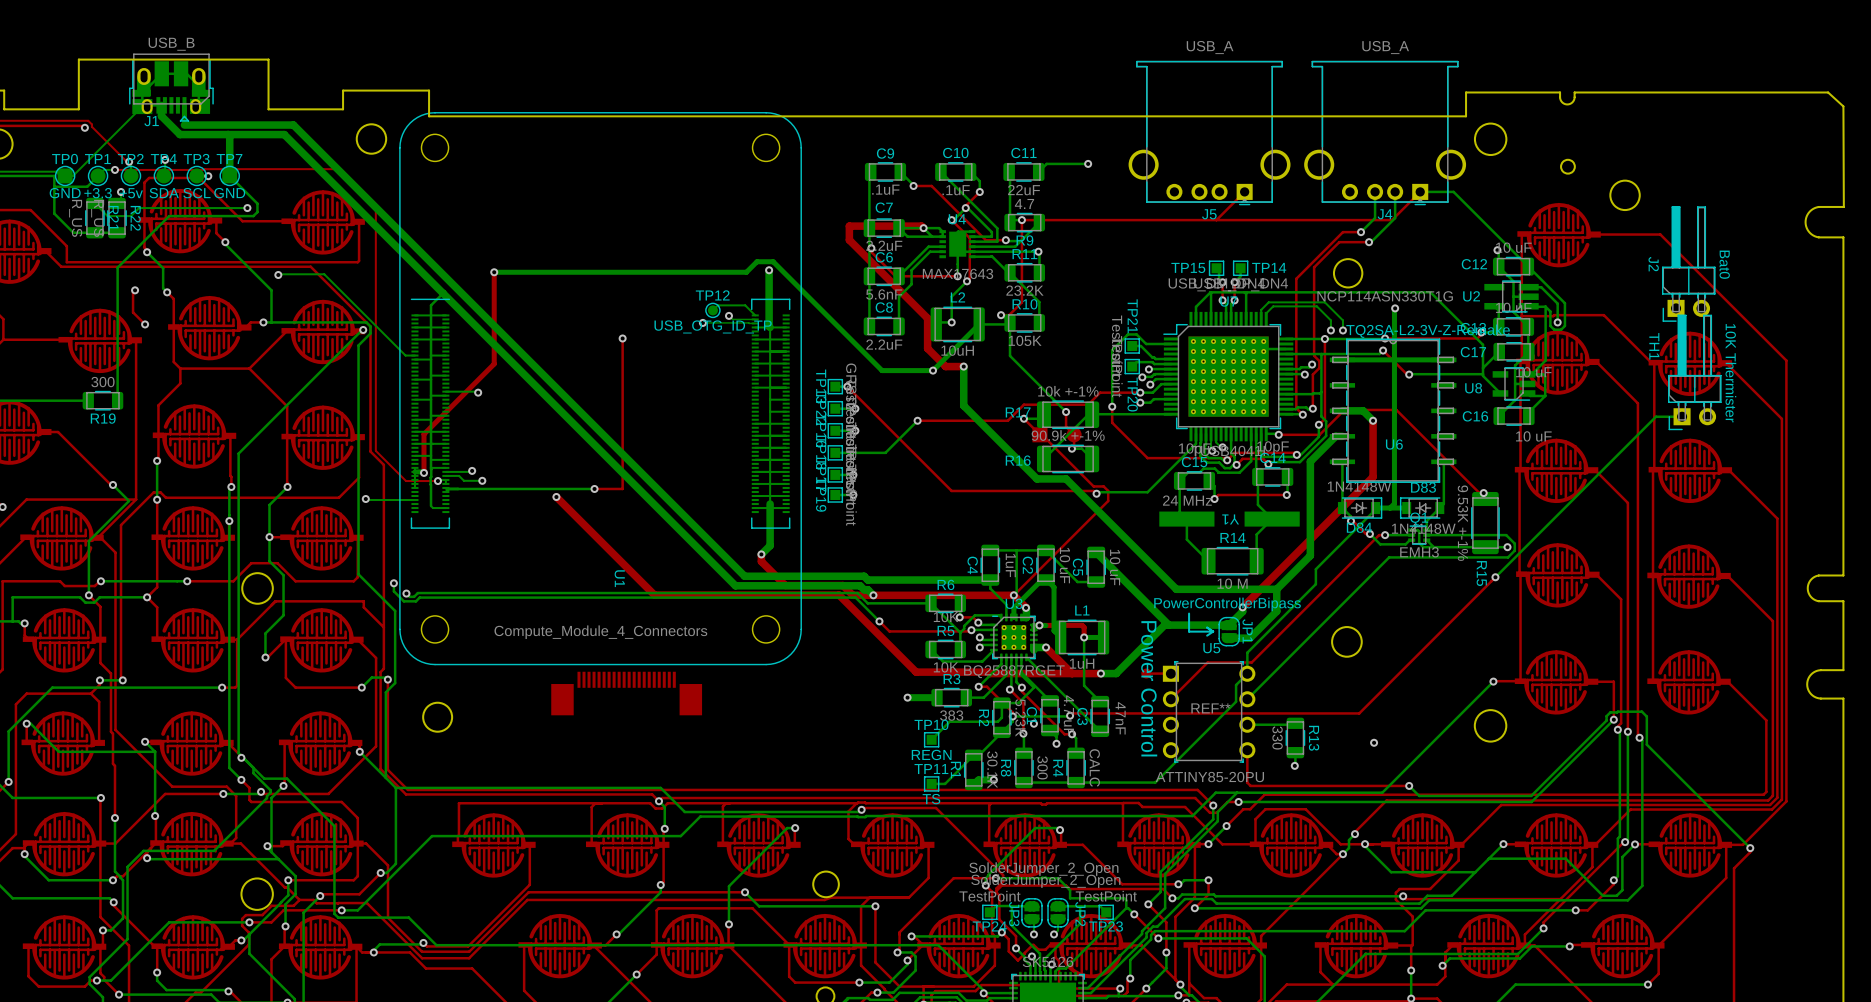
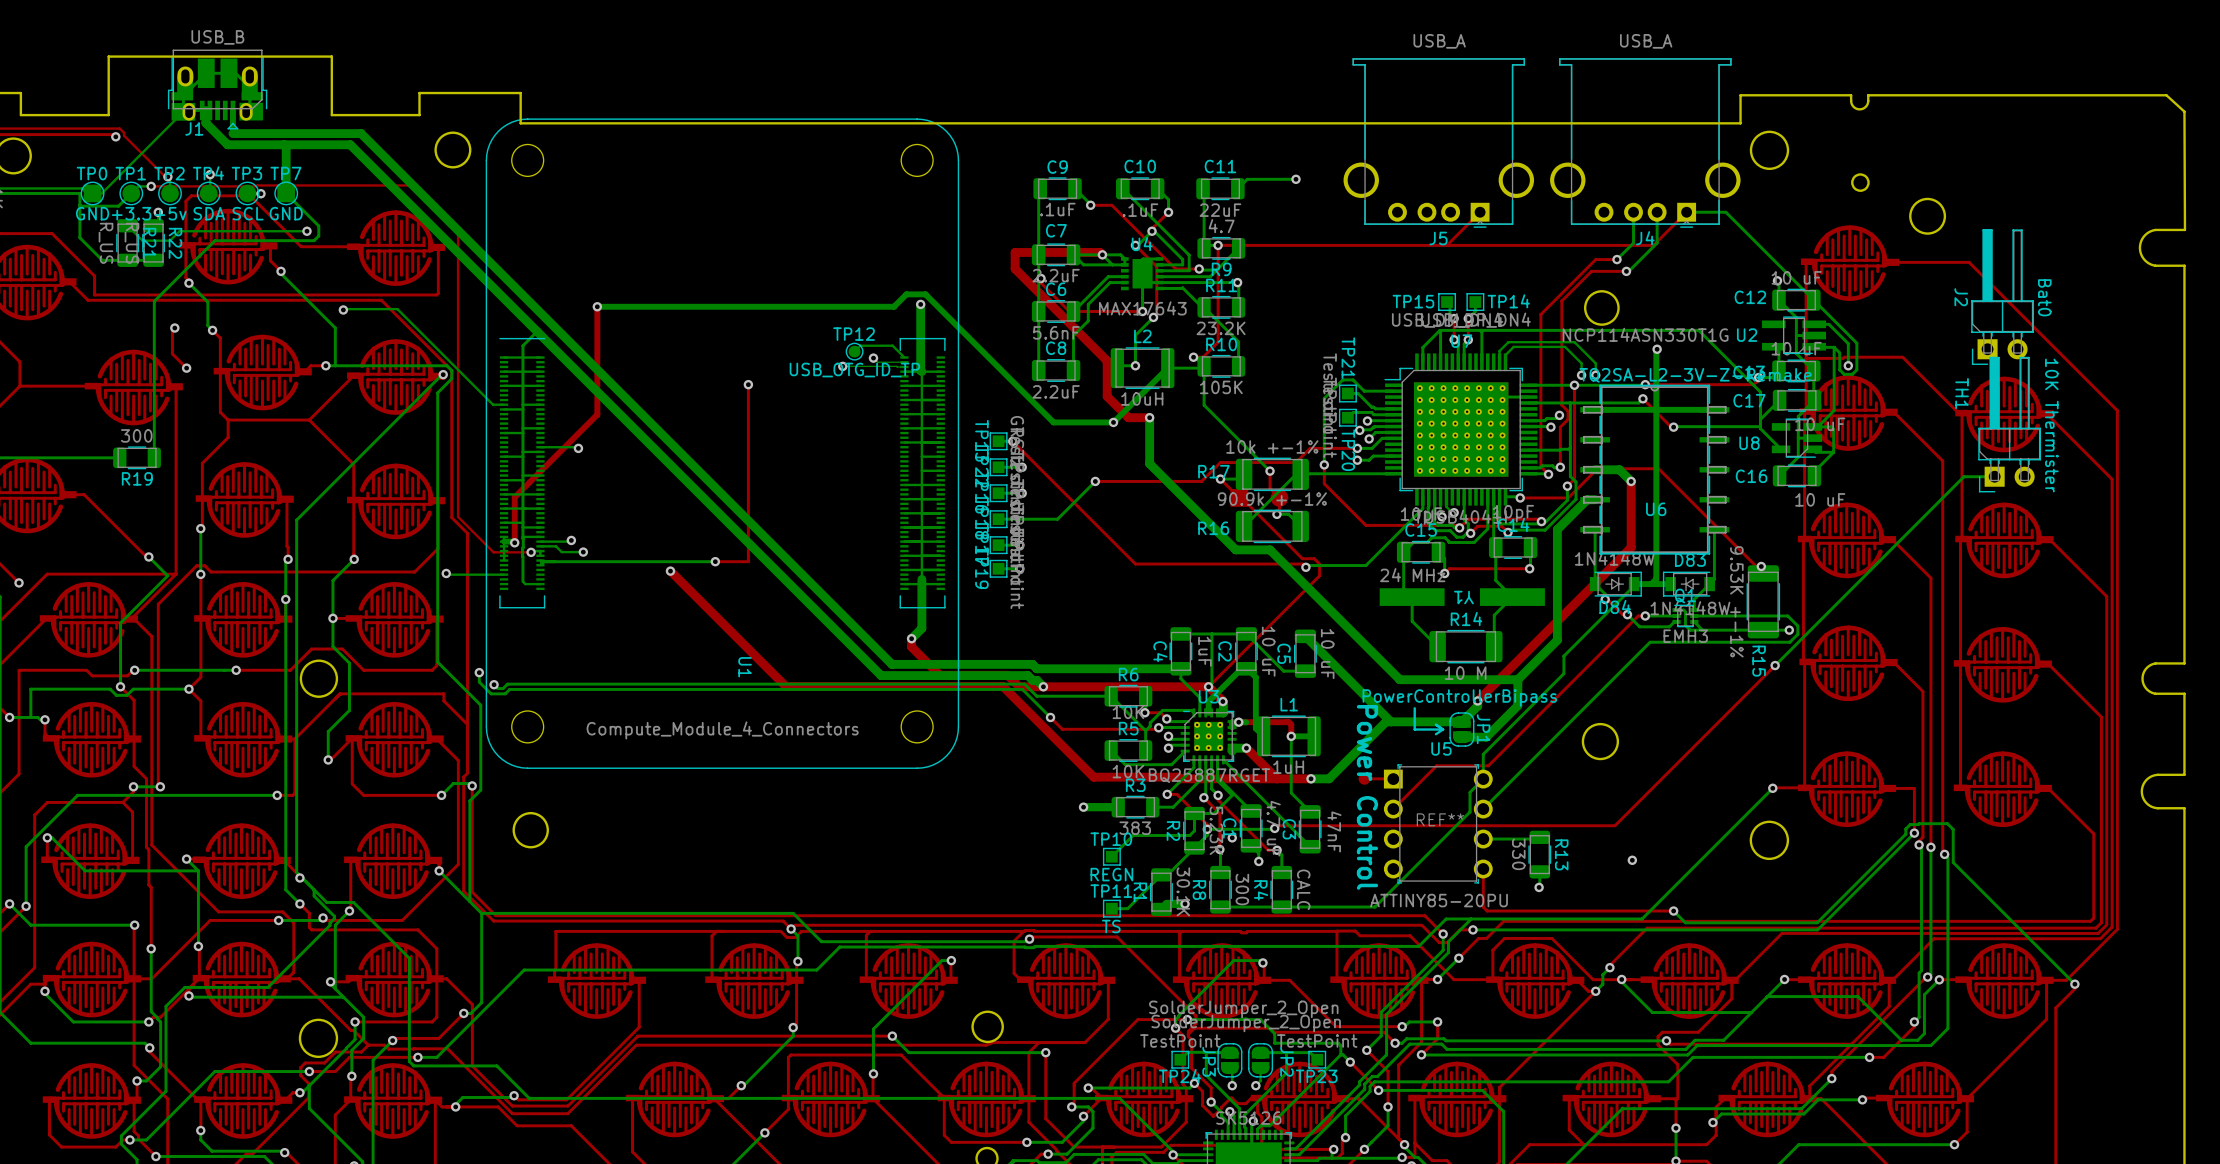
part: (626, 693) -> none

